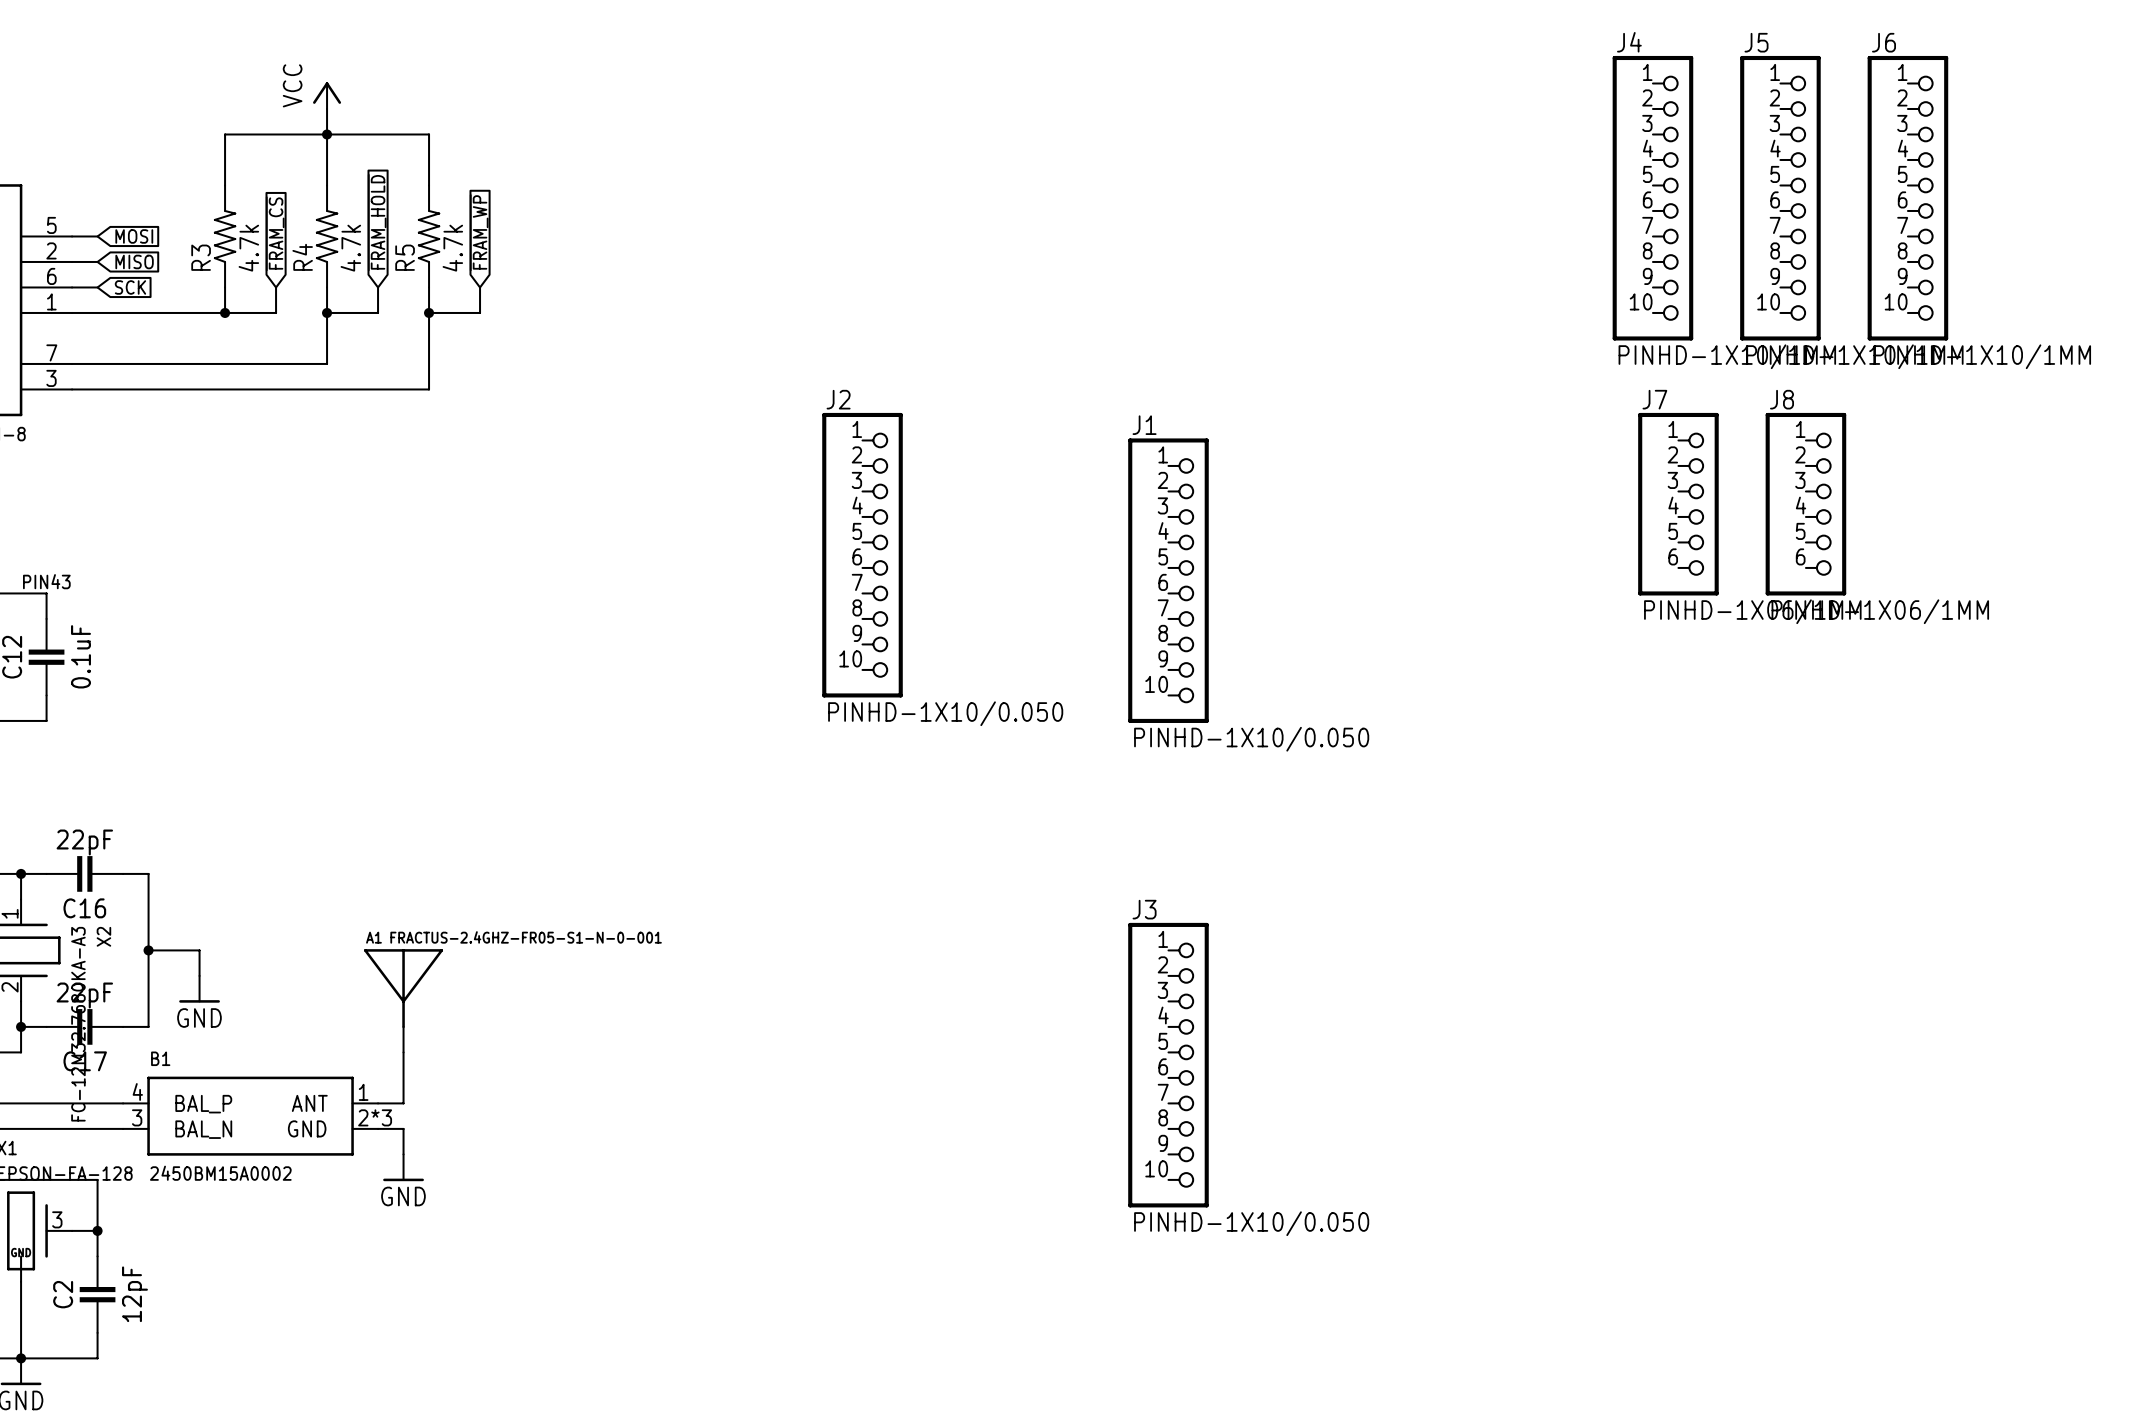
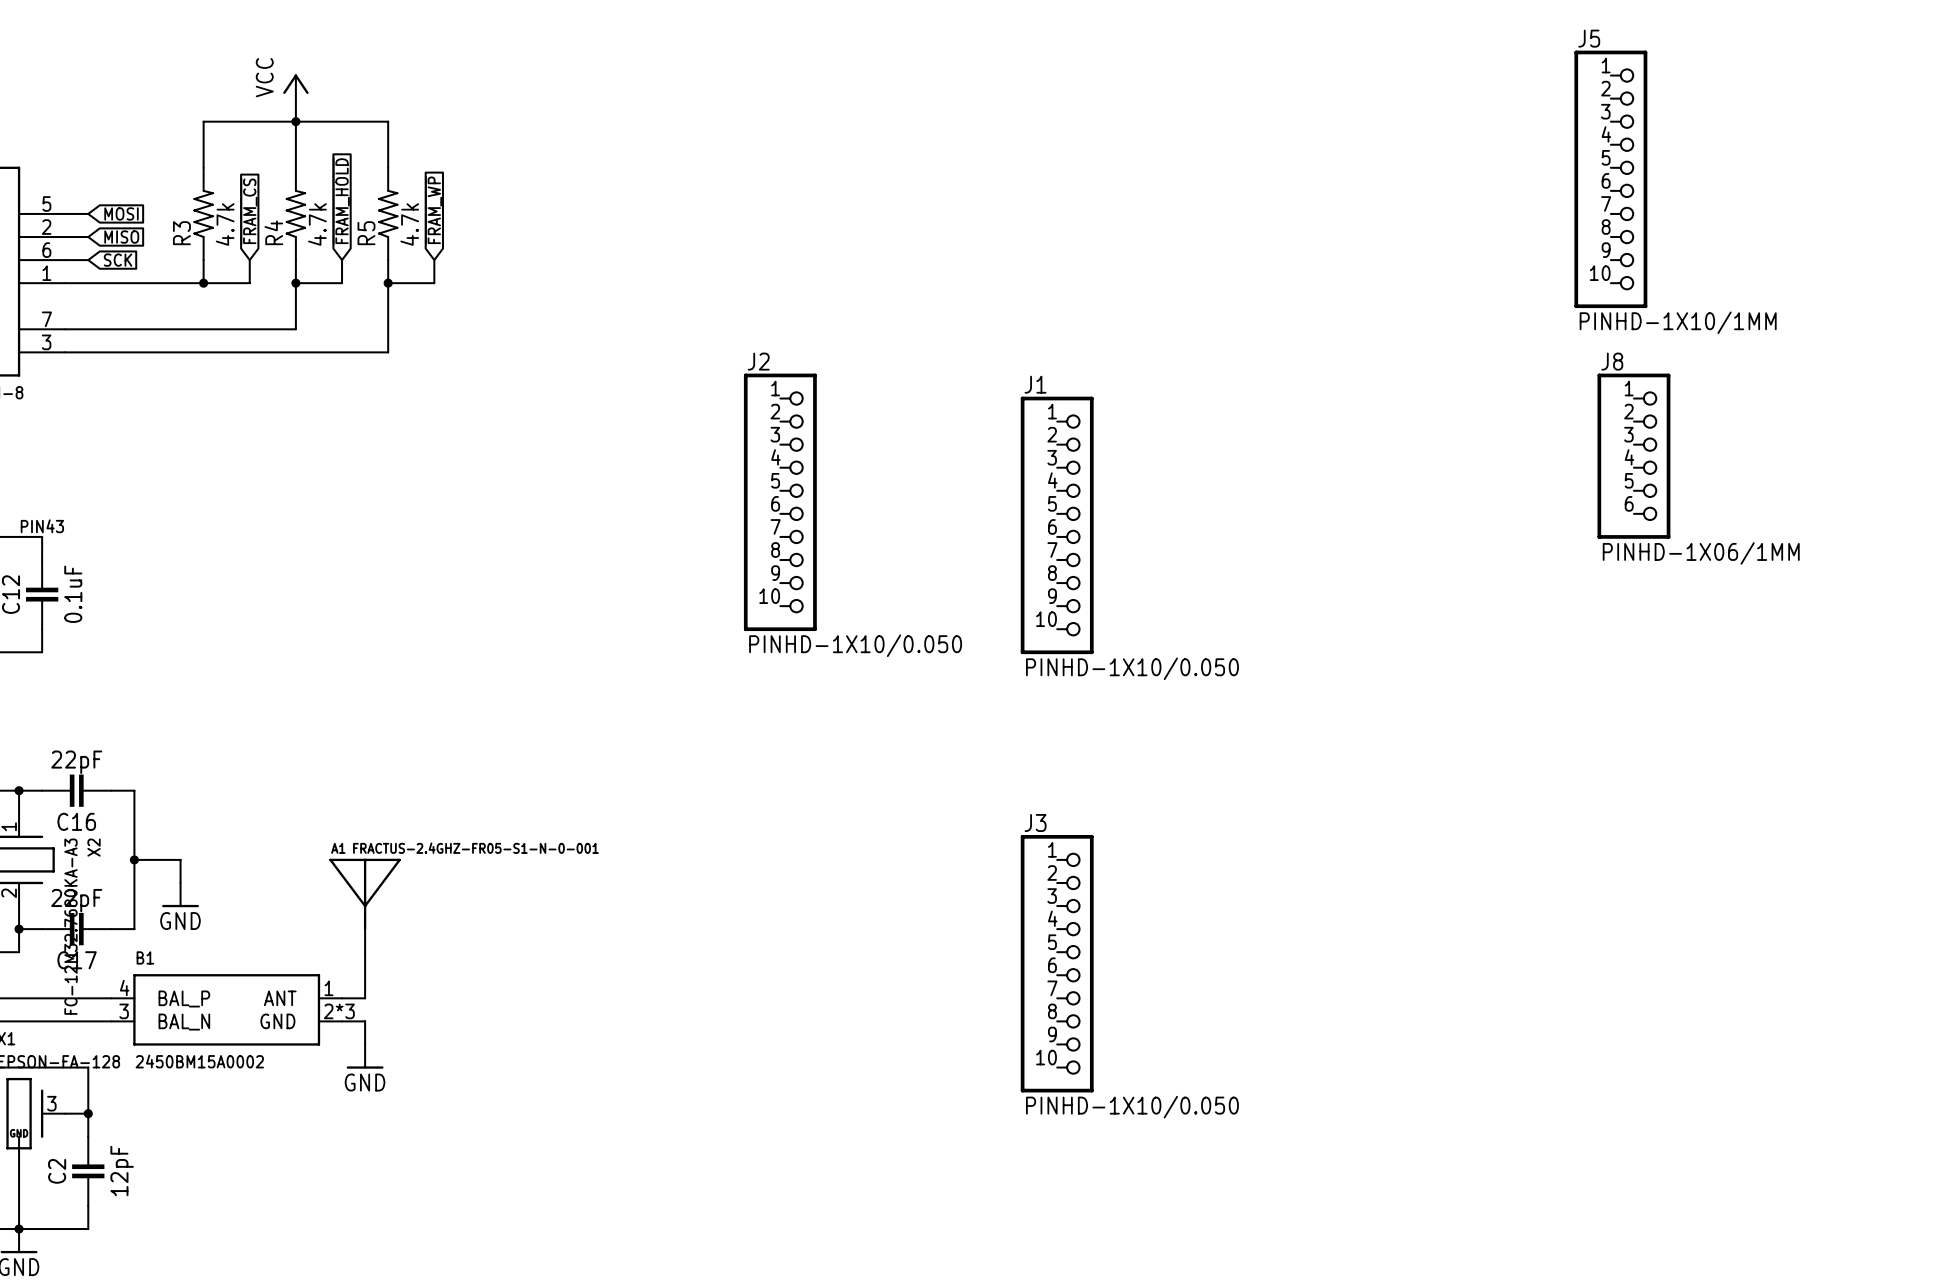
J4: PINHD-1X10/1MM (1652, 198) -> none
J6: PINHD-1X10/1MM (1907, 198) -> none
J7: PINHD-1X06/1MM (1678, 504) -> none

